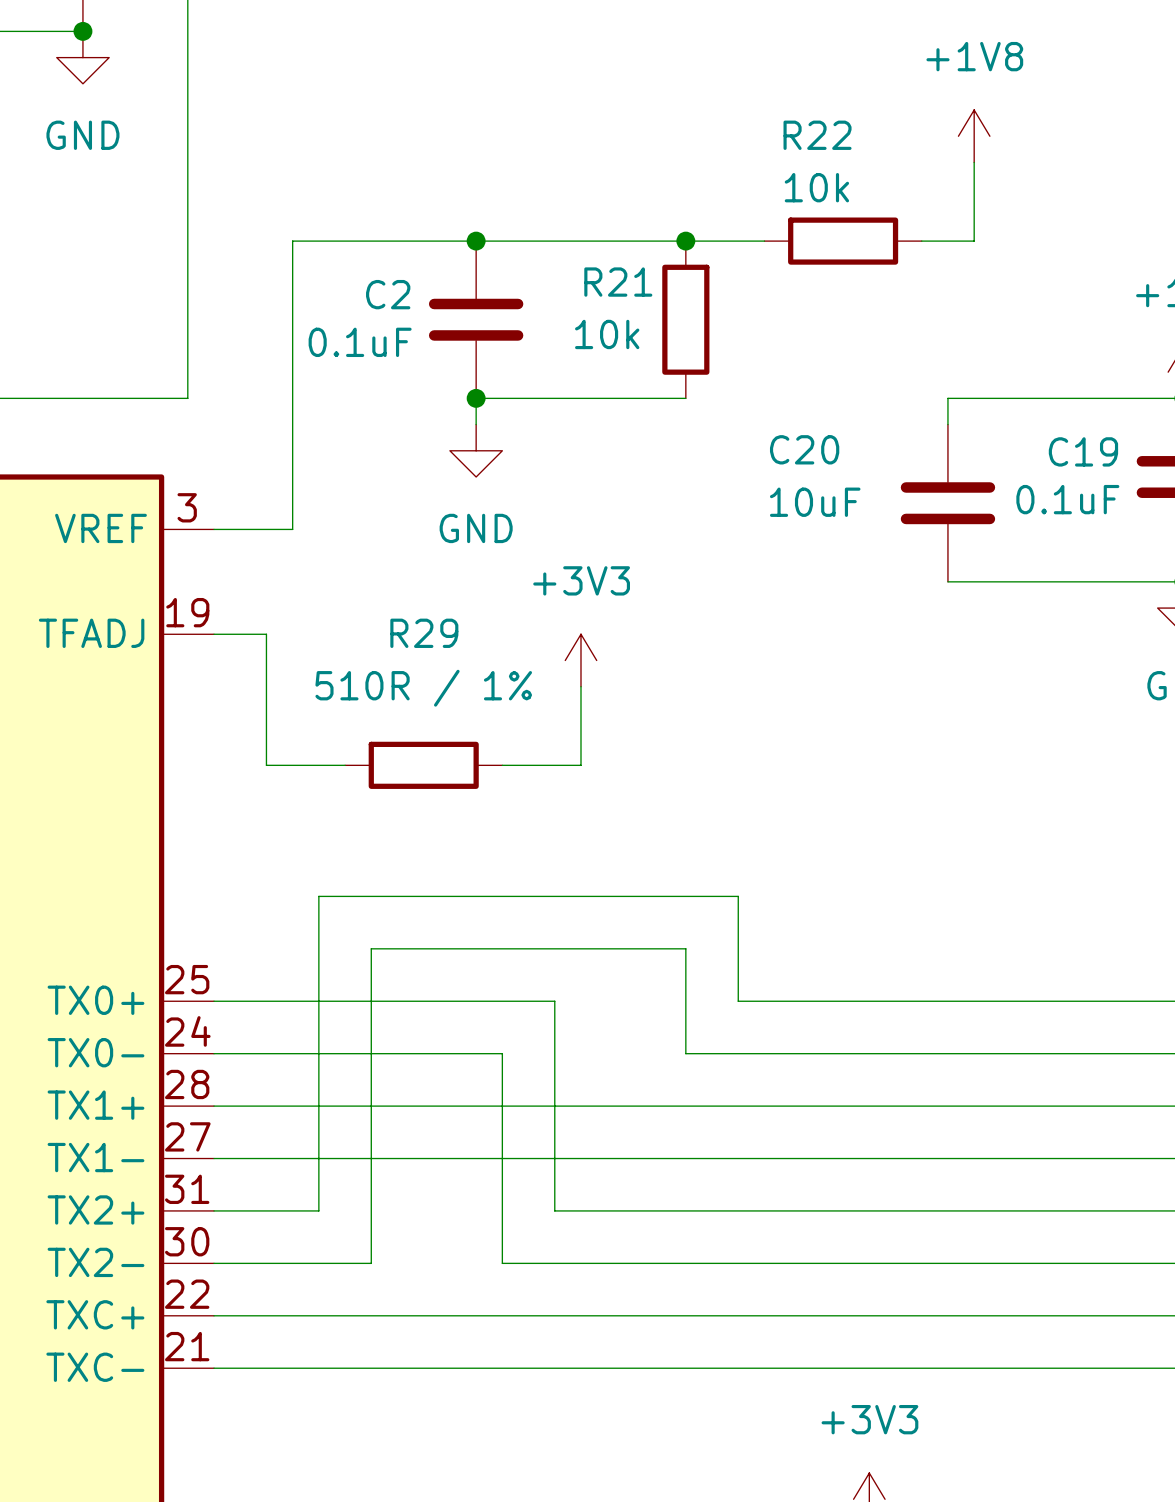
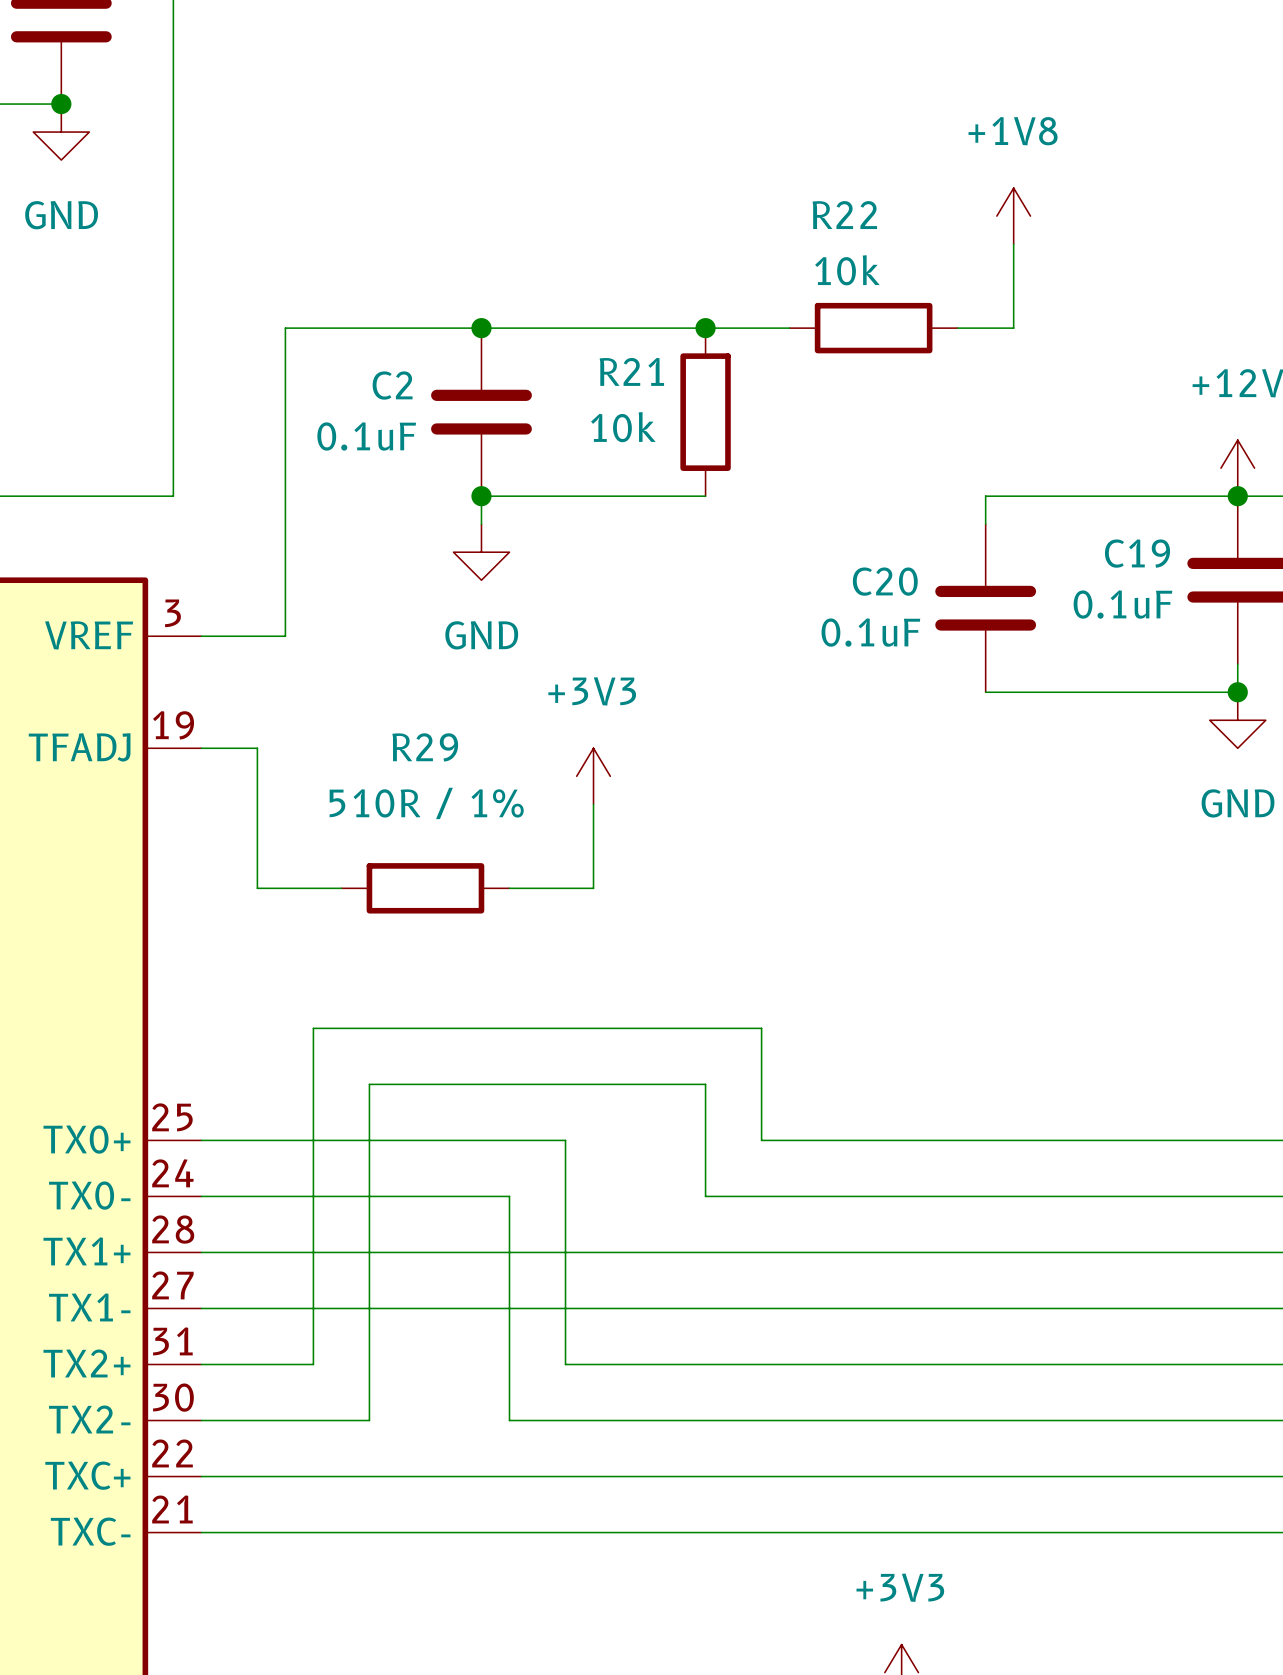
C20 name position: C20 (804, 449) -> C20 (885, 581)
C20 value: 10uF (815, 502) -> 0.1uF (870, 632)

